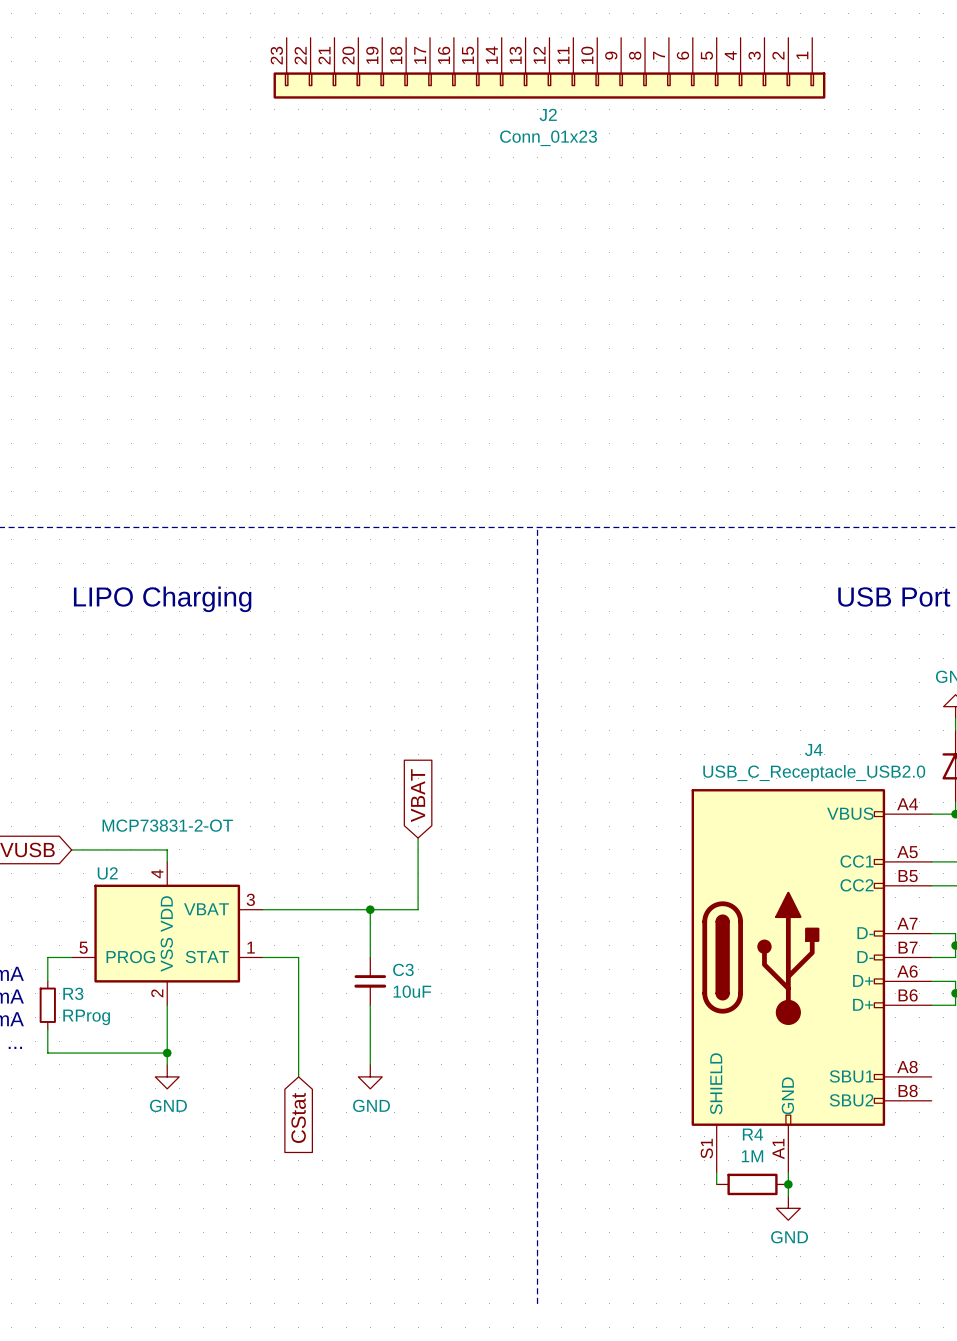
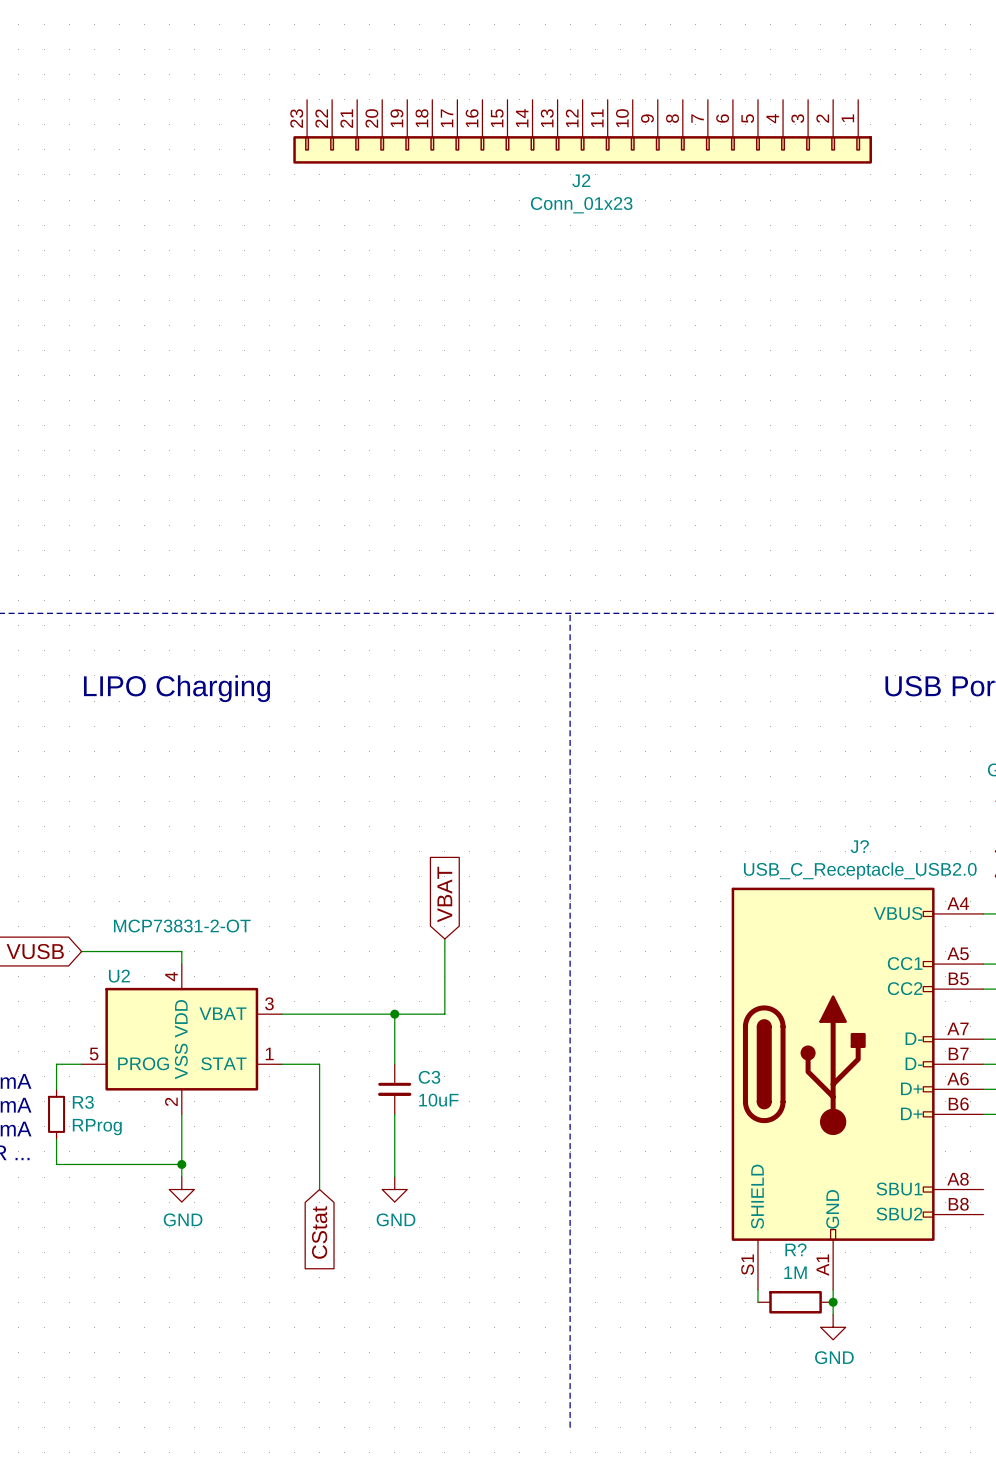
J4 name: J4 (813, 750) -> J? (859, 846)
R4 name: R4 (752, 1134) -> R? (795, 1249)

